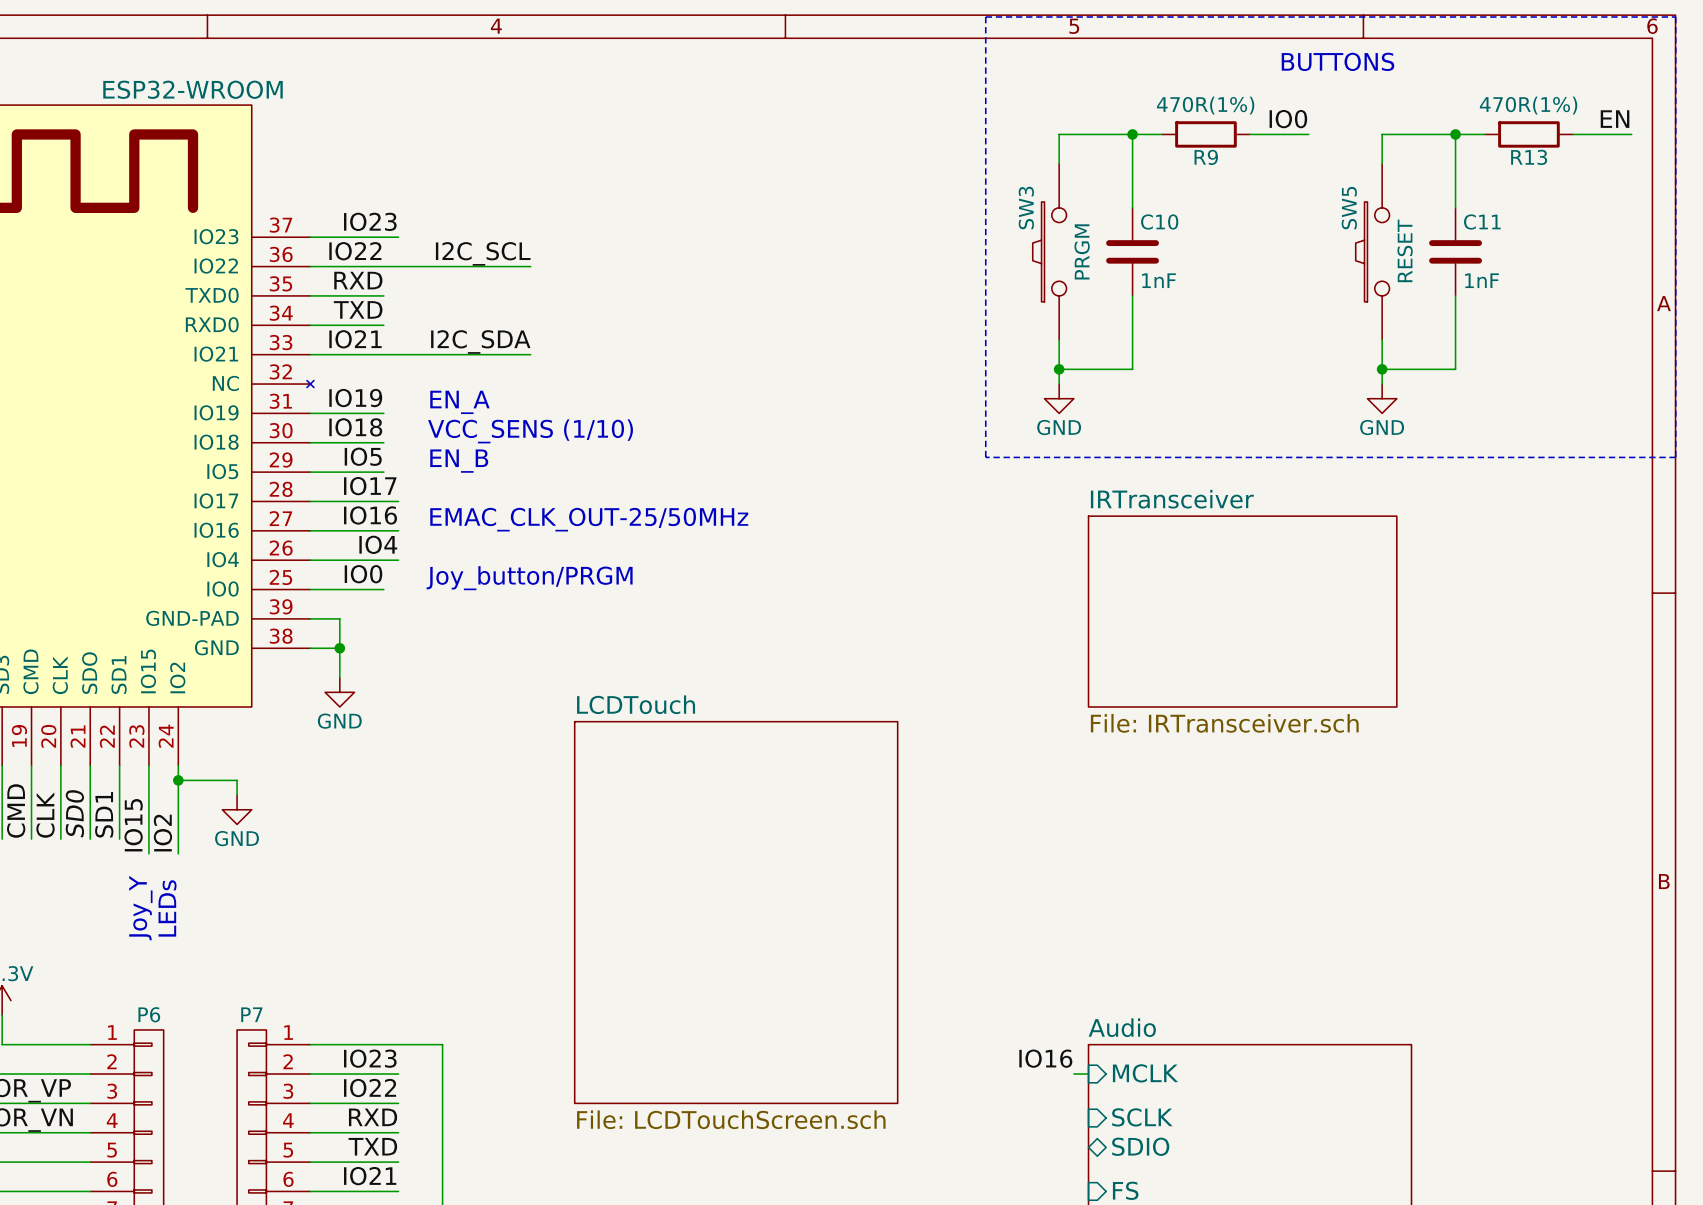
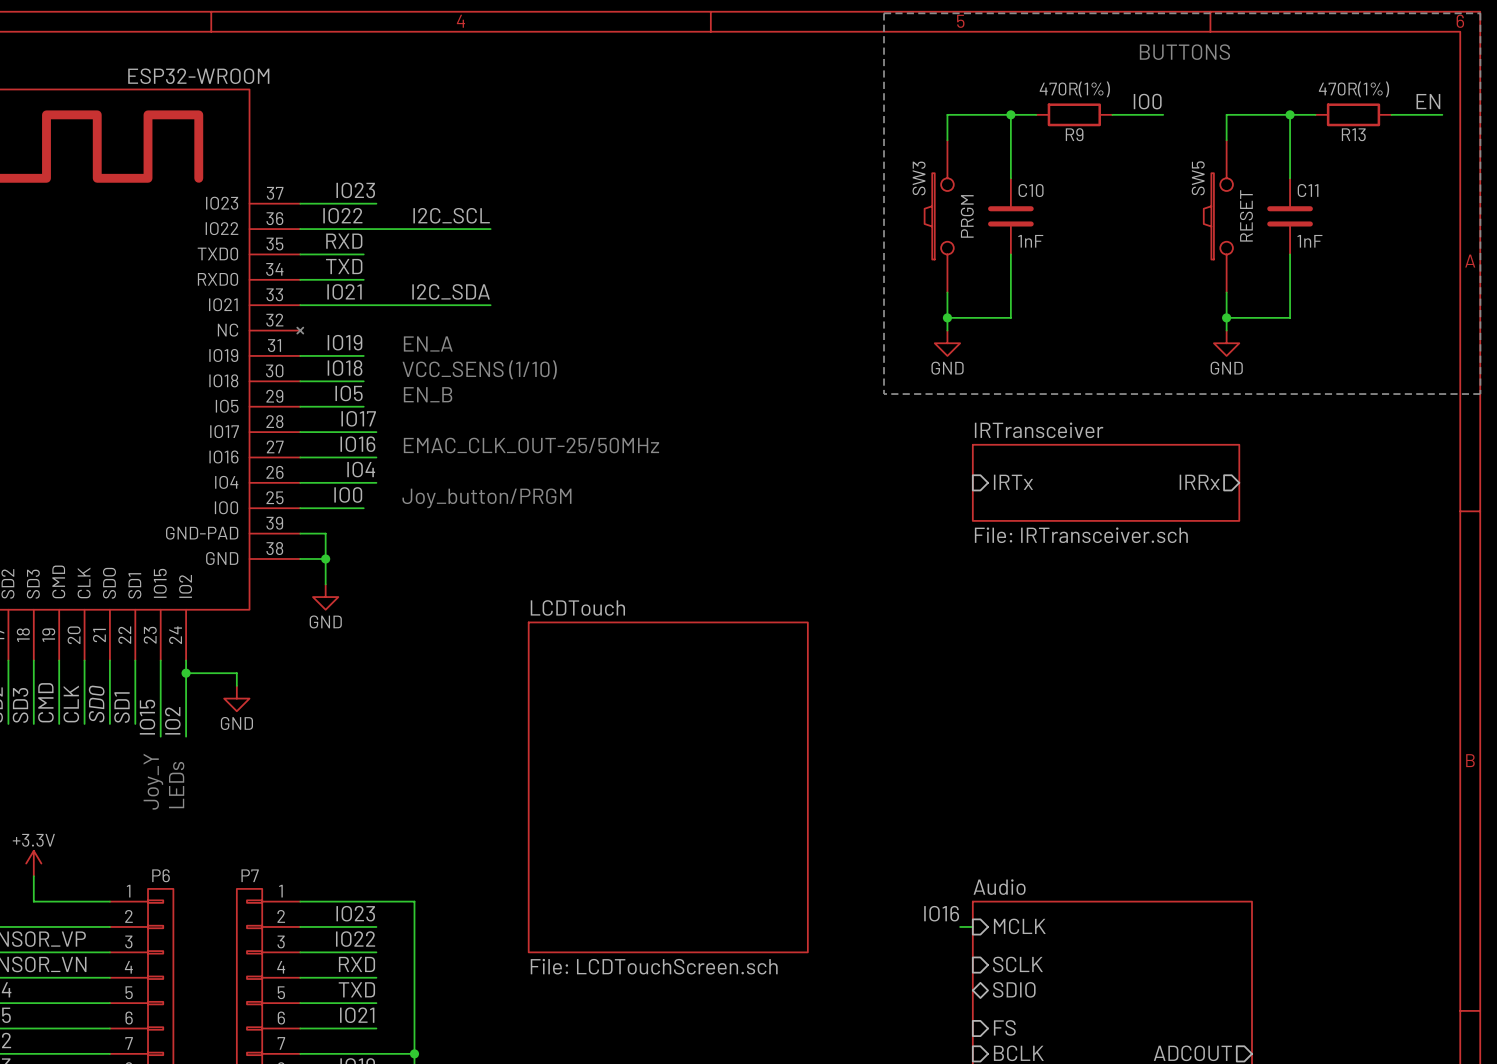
sheet pin: none -> IRTx (1013, 482)
sheet pin: none -> IRRx (1199, 482)
sheet IRTransceiver: none -> File: IRTransceiver.sch (1106, 482)
sheet IRTransceiver: File: IRTransceiver.sch (1242, 611) -> none

